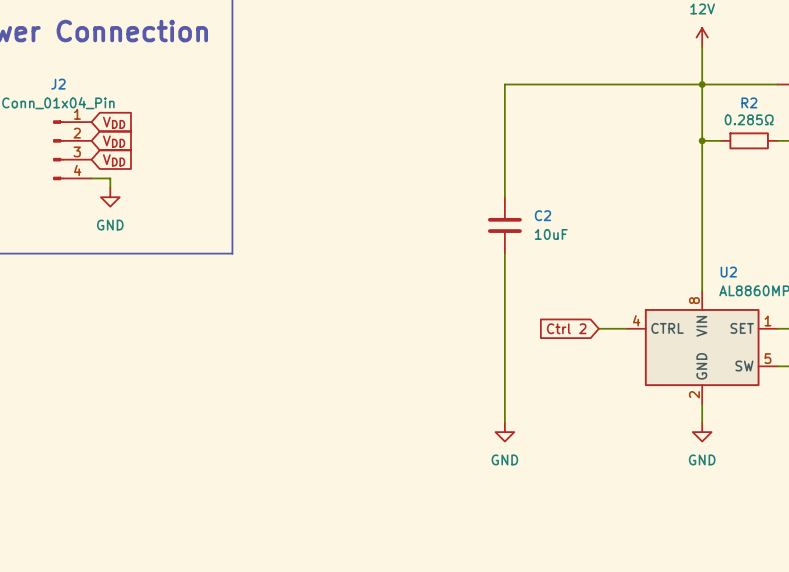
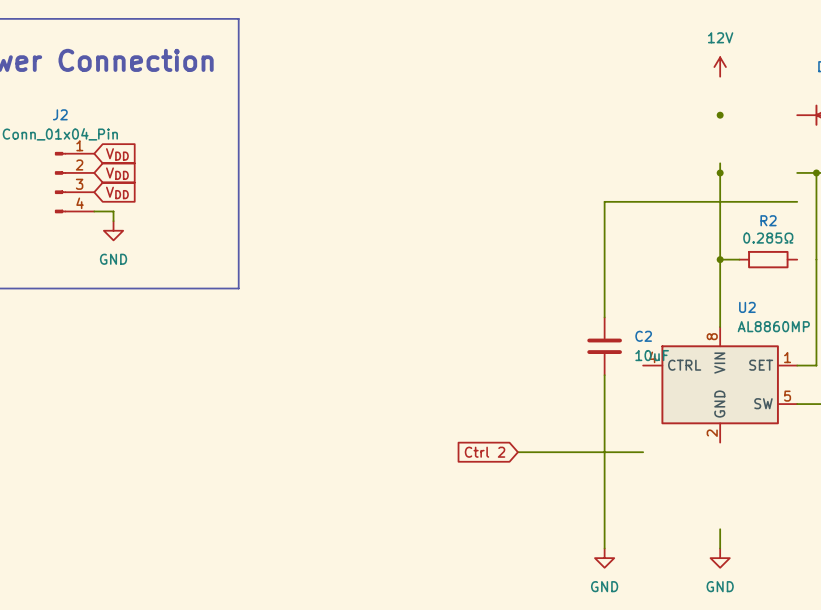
wire: (702, 46) (702, 131) -> none
wire: (777, 84) (504, 84) (504, 197) -> none
wire: (702, 140) (720, 140) -> (720, 259) (739, 259)
R2 position: (749, 140) -> (768, 259)
wire: none -> (797, 201) (604, 201) (604, 317)
C2 position: (504, 225) -> (604, 346)
junction: none -> (720, 259)
wire: (504, 253) (504, 422) -> (604, 375) (604, 548)
global label position: Ctrl 2 (566, 328) -> Ctrl 2 (485, 452)
wire: (598, 328) (627, 328) -> none
wire: (702, 403) (702, 422) -> (720, 529) (720, 548)
wire: none -> (517, 452) (643, 452)
power symbol: GND (504, 432) -> none
power symbol: GND (702, 432) -> none
power symbol: none -> GND (604, 558)
power symbol: none -> GND (720, 558)

